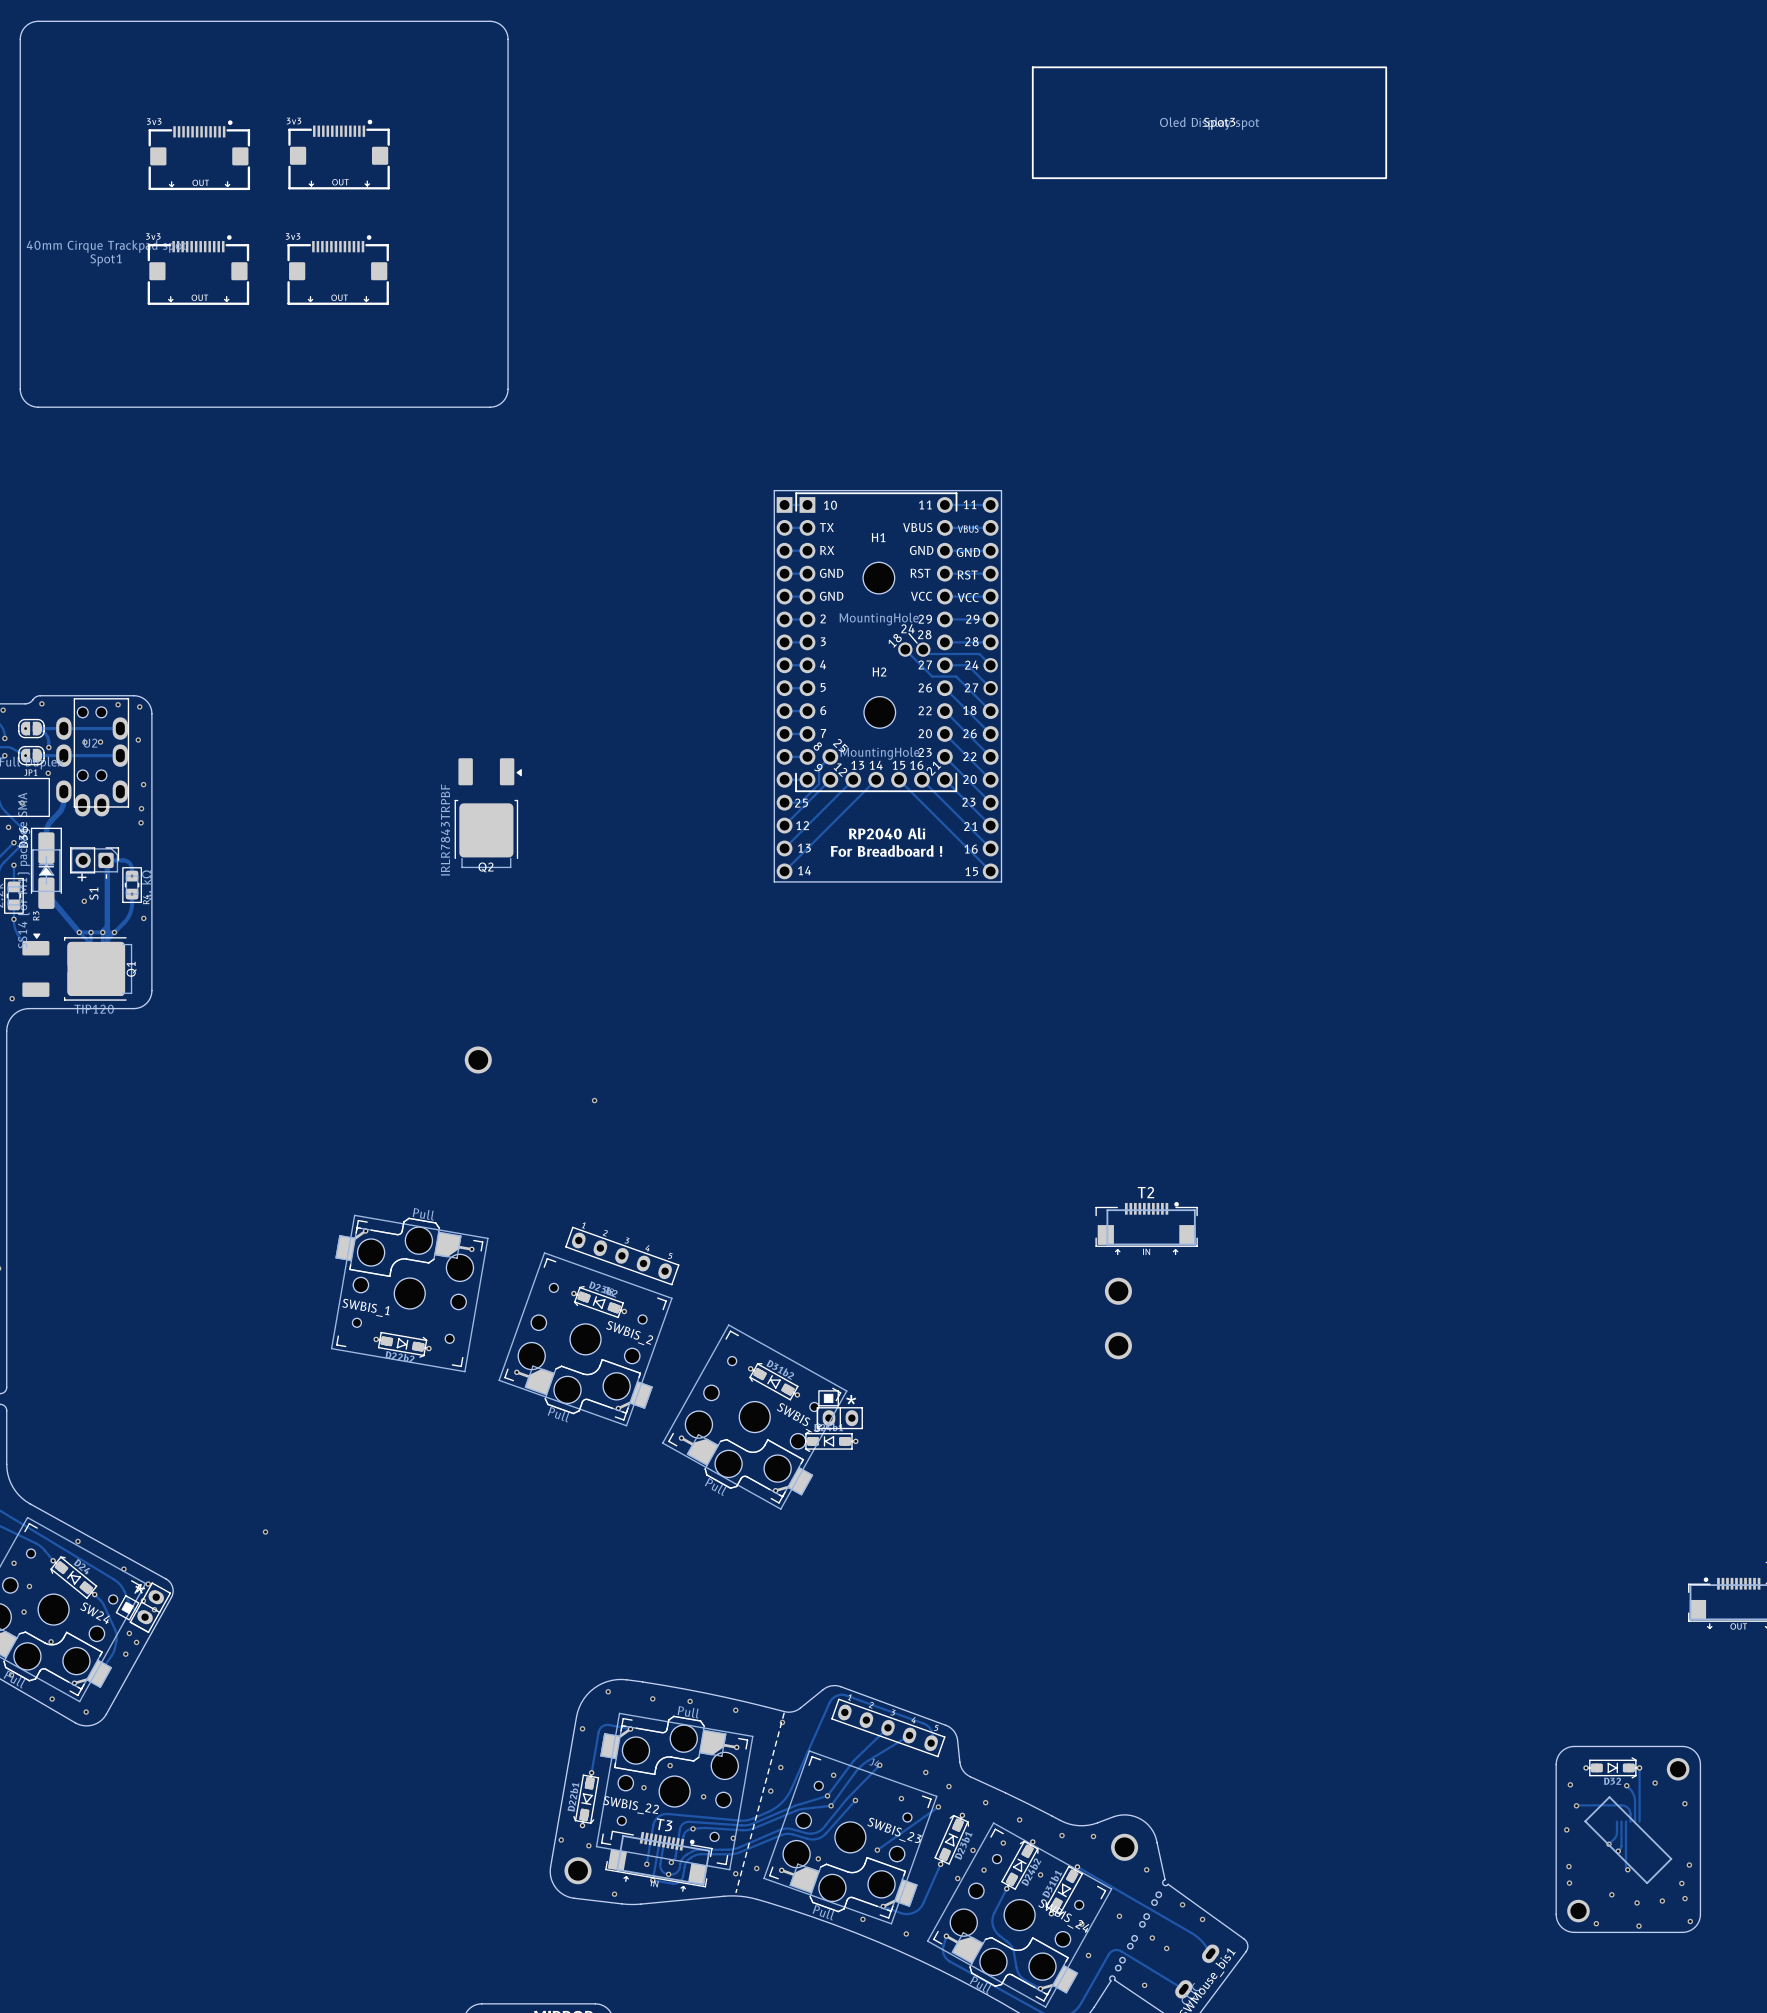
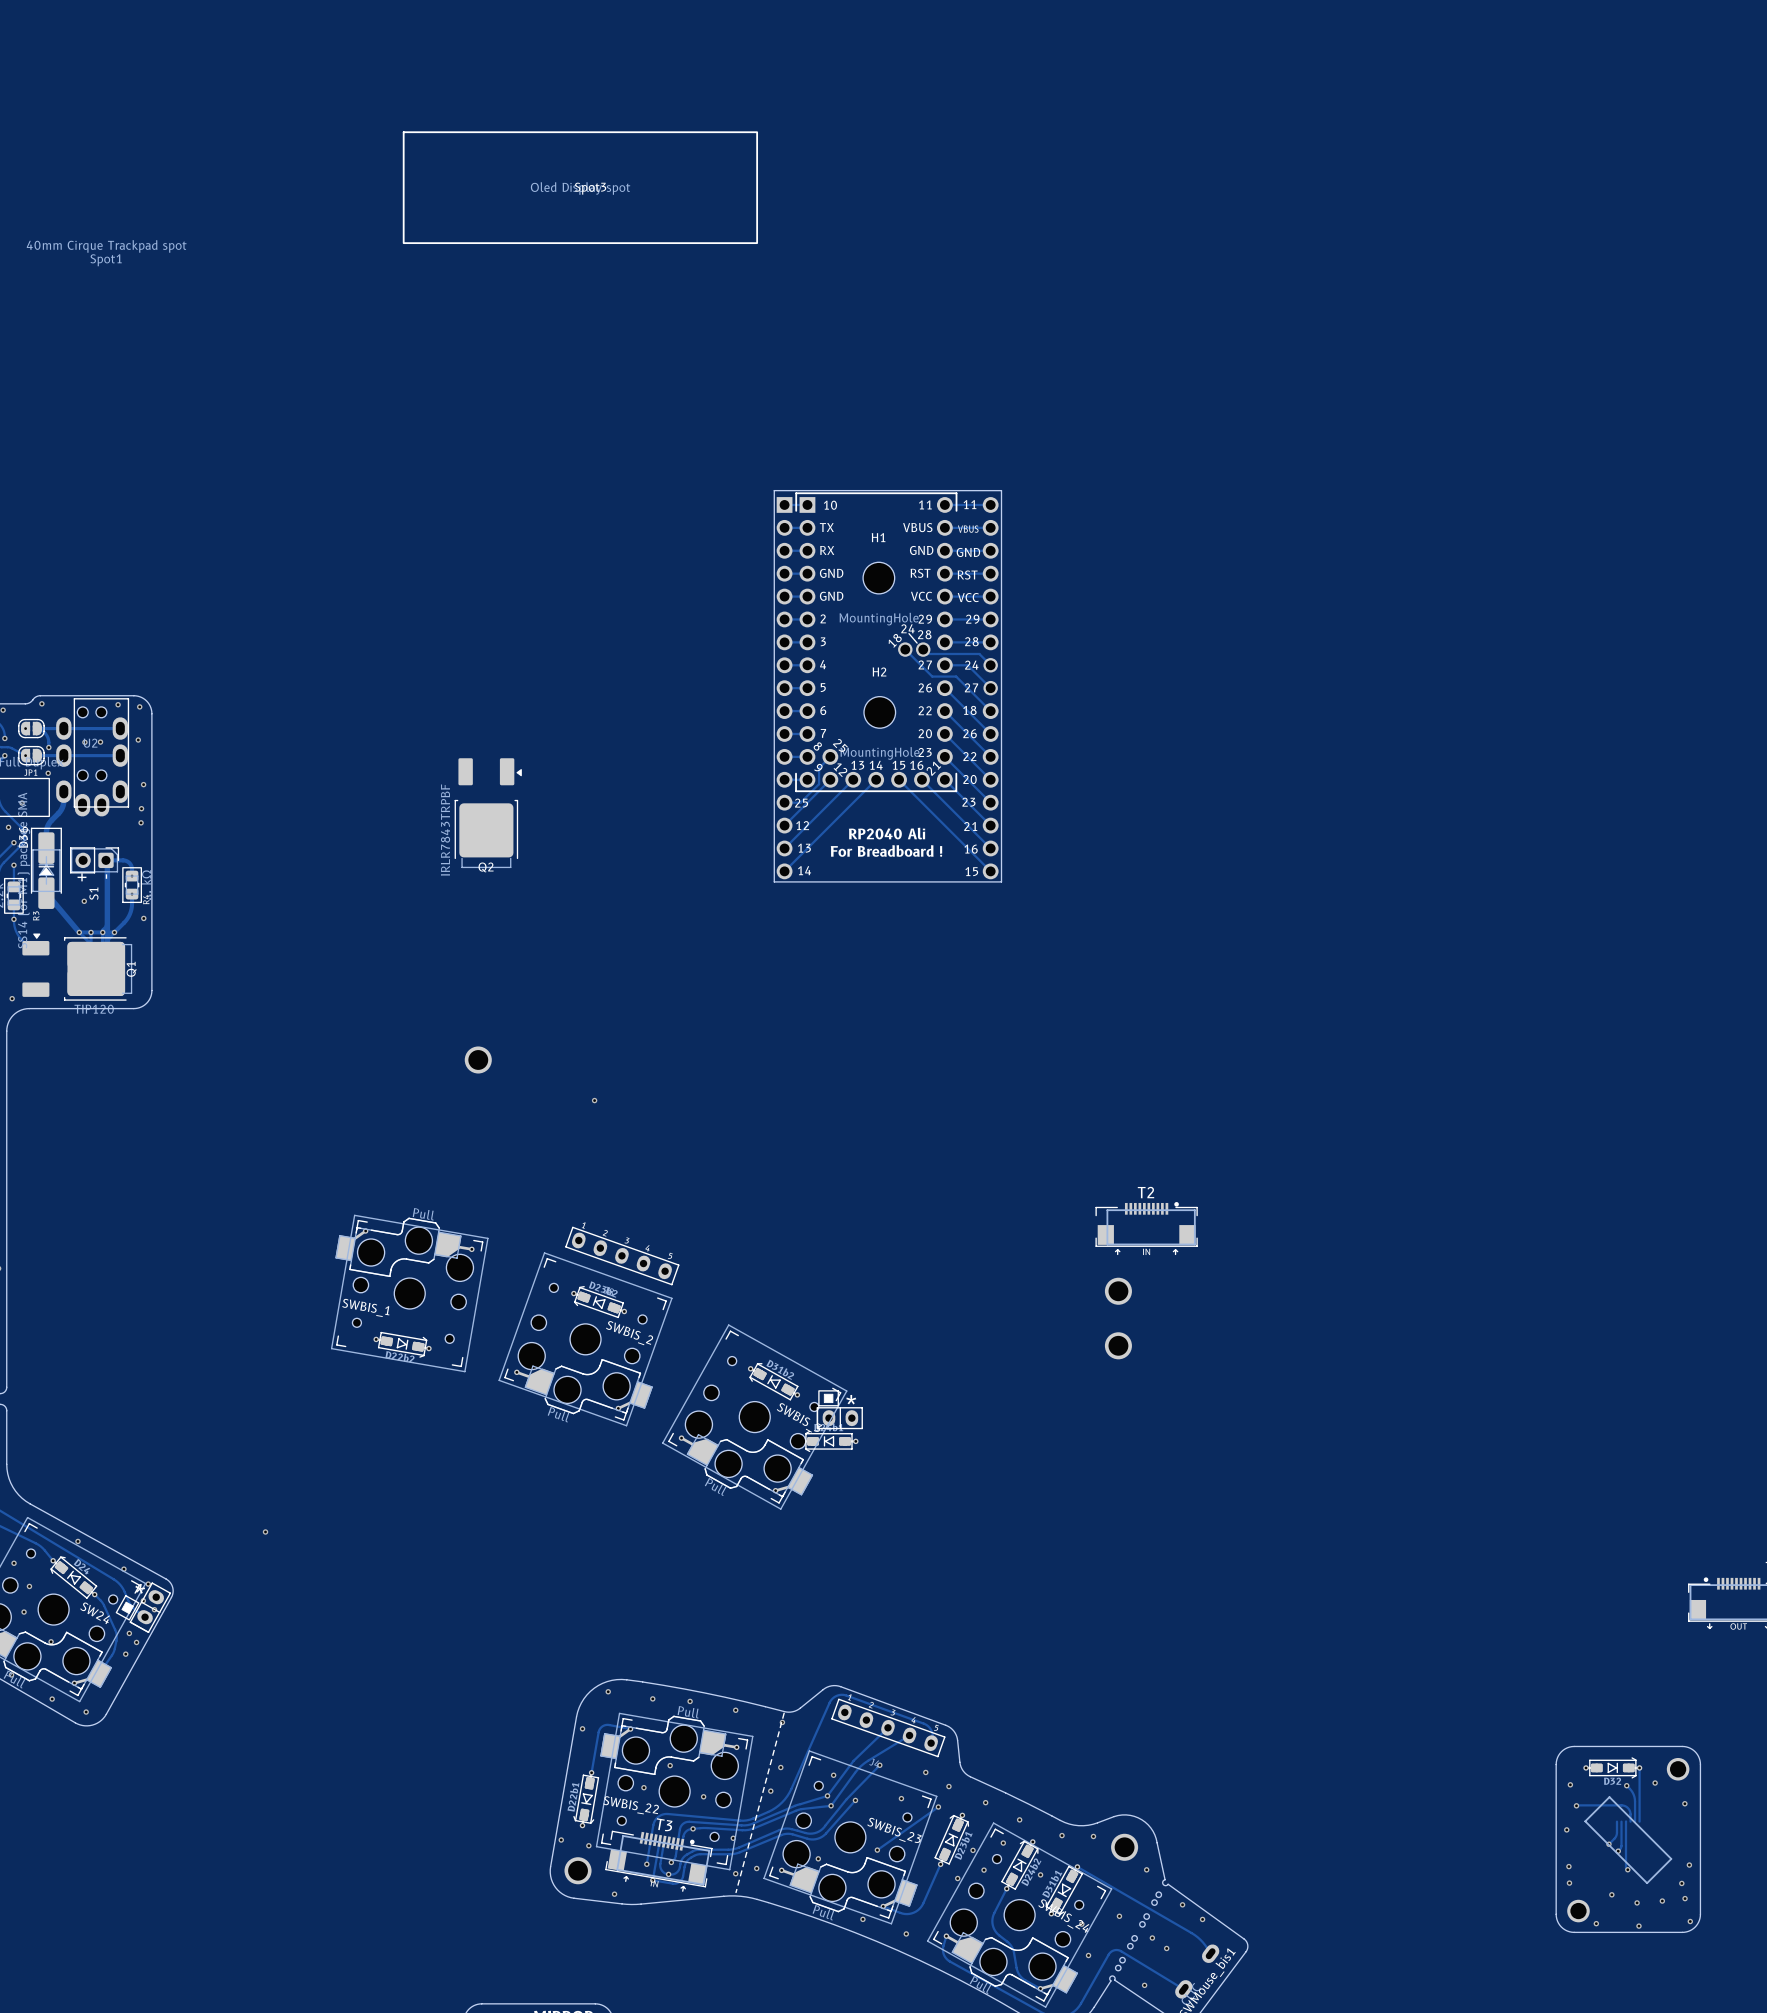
board edge: (38, 21) (490, 21) (501, 25) (506, 31) (508, 39) (508, 389) (504, 400) (497, 405) (490, 407) (38, 407) (27, 403) (22, 397) (20, 389) (20, 39) (25, 26) (38, 21) -> none
Spot3 position: (1209, 122) -> (580, 187)
part: (339, 154) -> none
part: (199, 155) -> none
part: (198, 270) -> none
part: (338, 270) -> none

